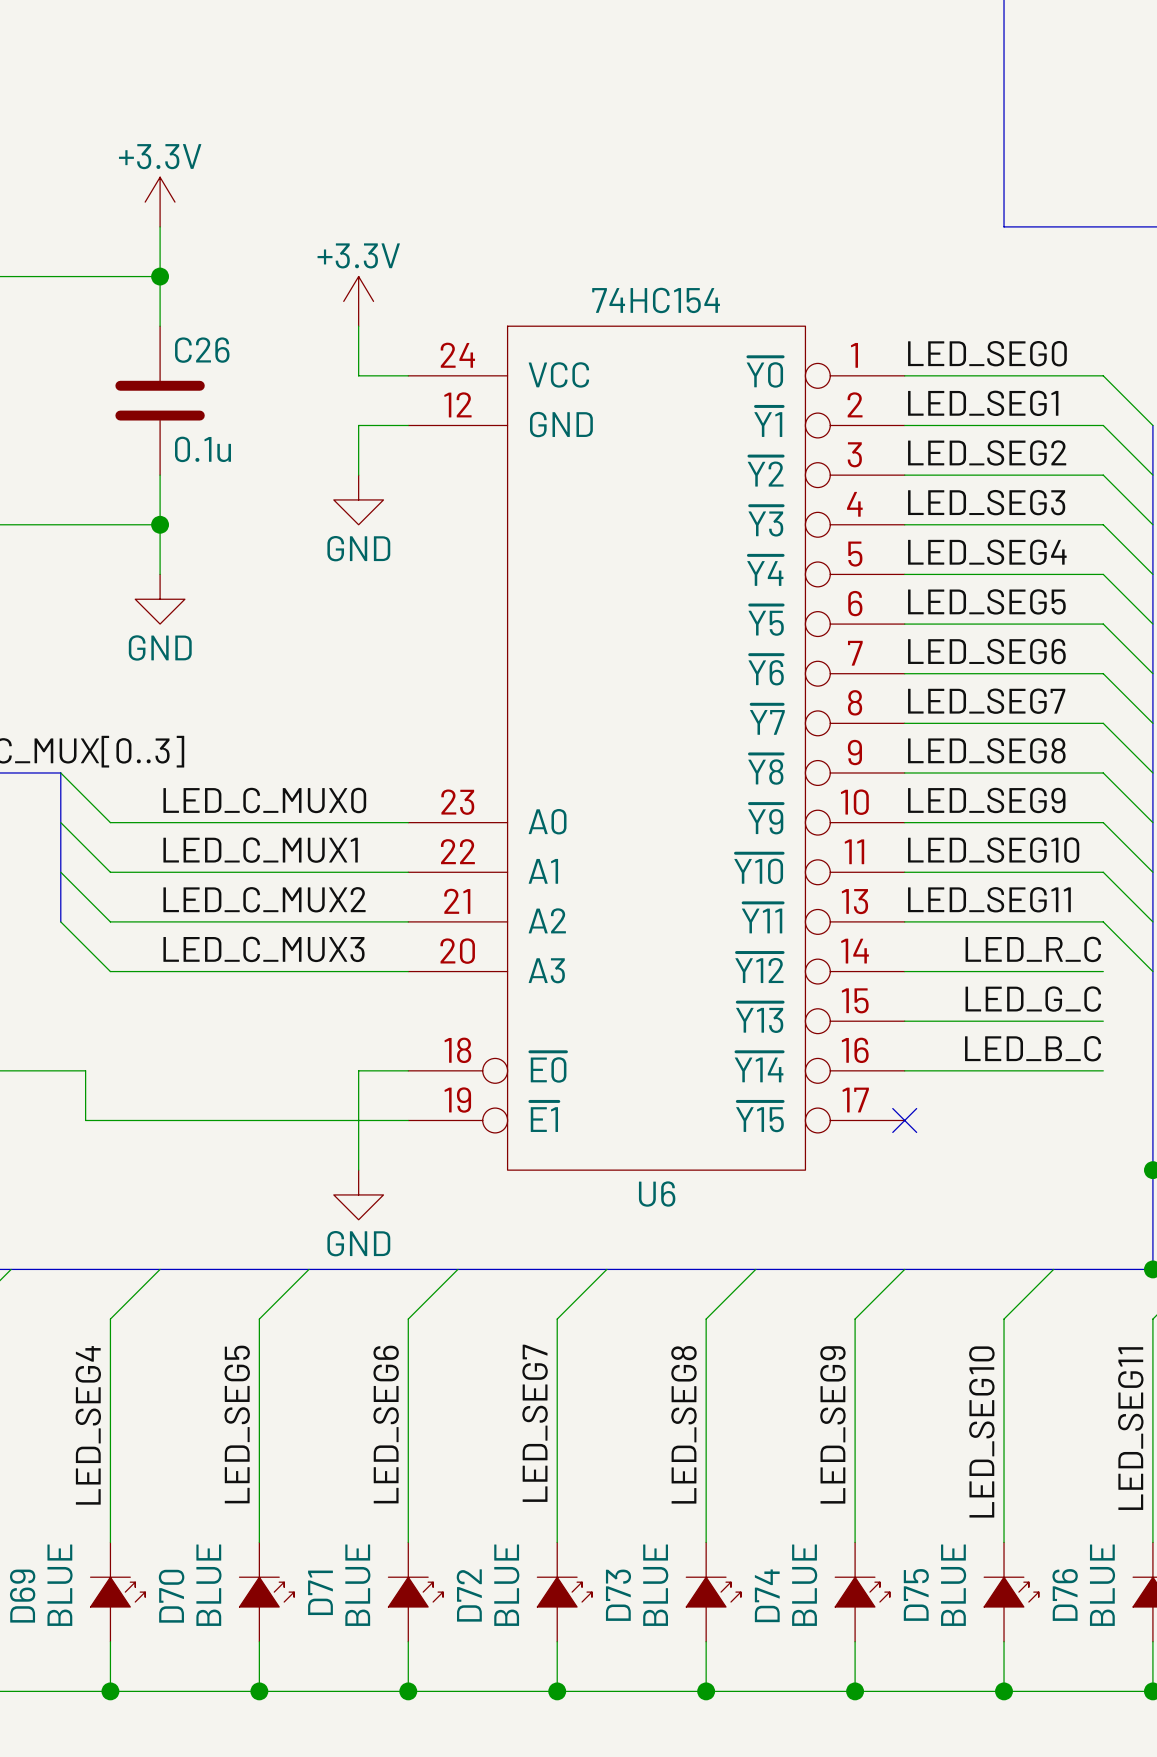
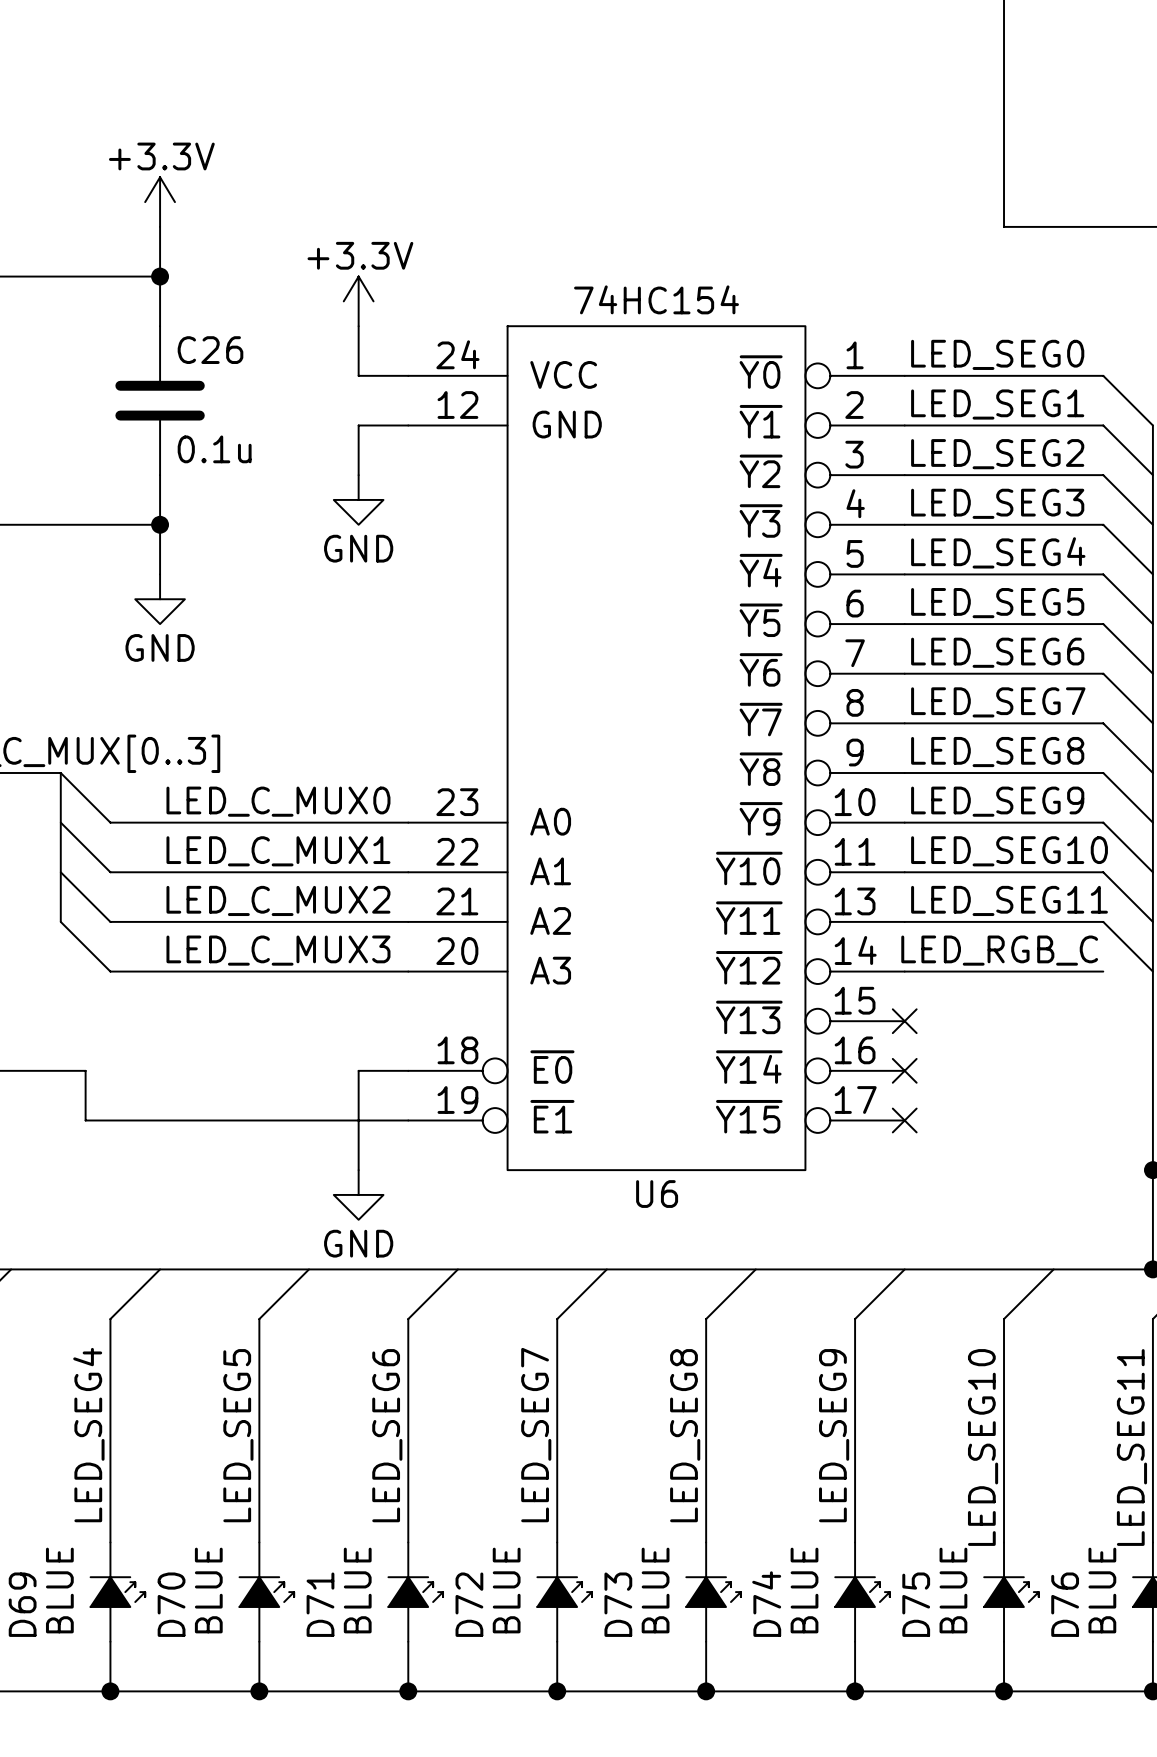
label: LED_R_C (1033, 949) -> LED_RGB_C (999, 950)
label: LED_G_C (1033, 999) -> none
wire: (904, 1021) (1103, 1021) -> none
no-connect mark: none -> (904, 1021)
label: LED_B_C (1033, 1048) -> none
wire: (904, 1070) (1103, 1070) -> none
no-connect mark: none -> (904, 1070)

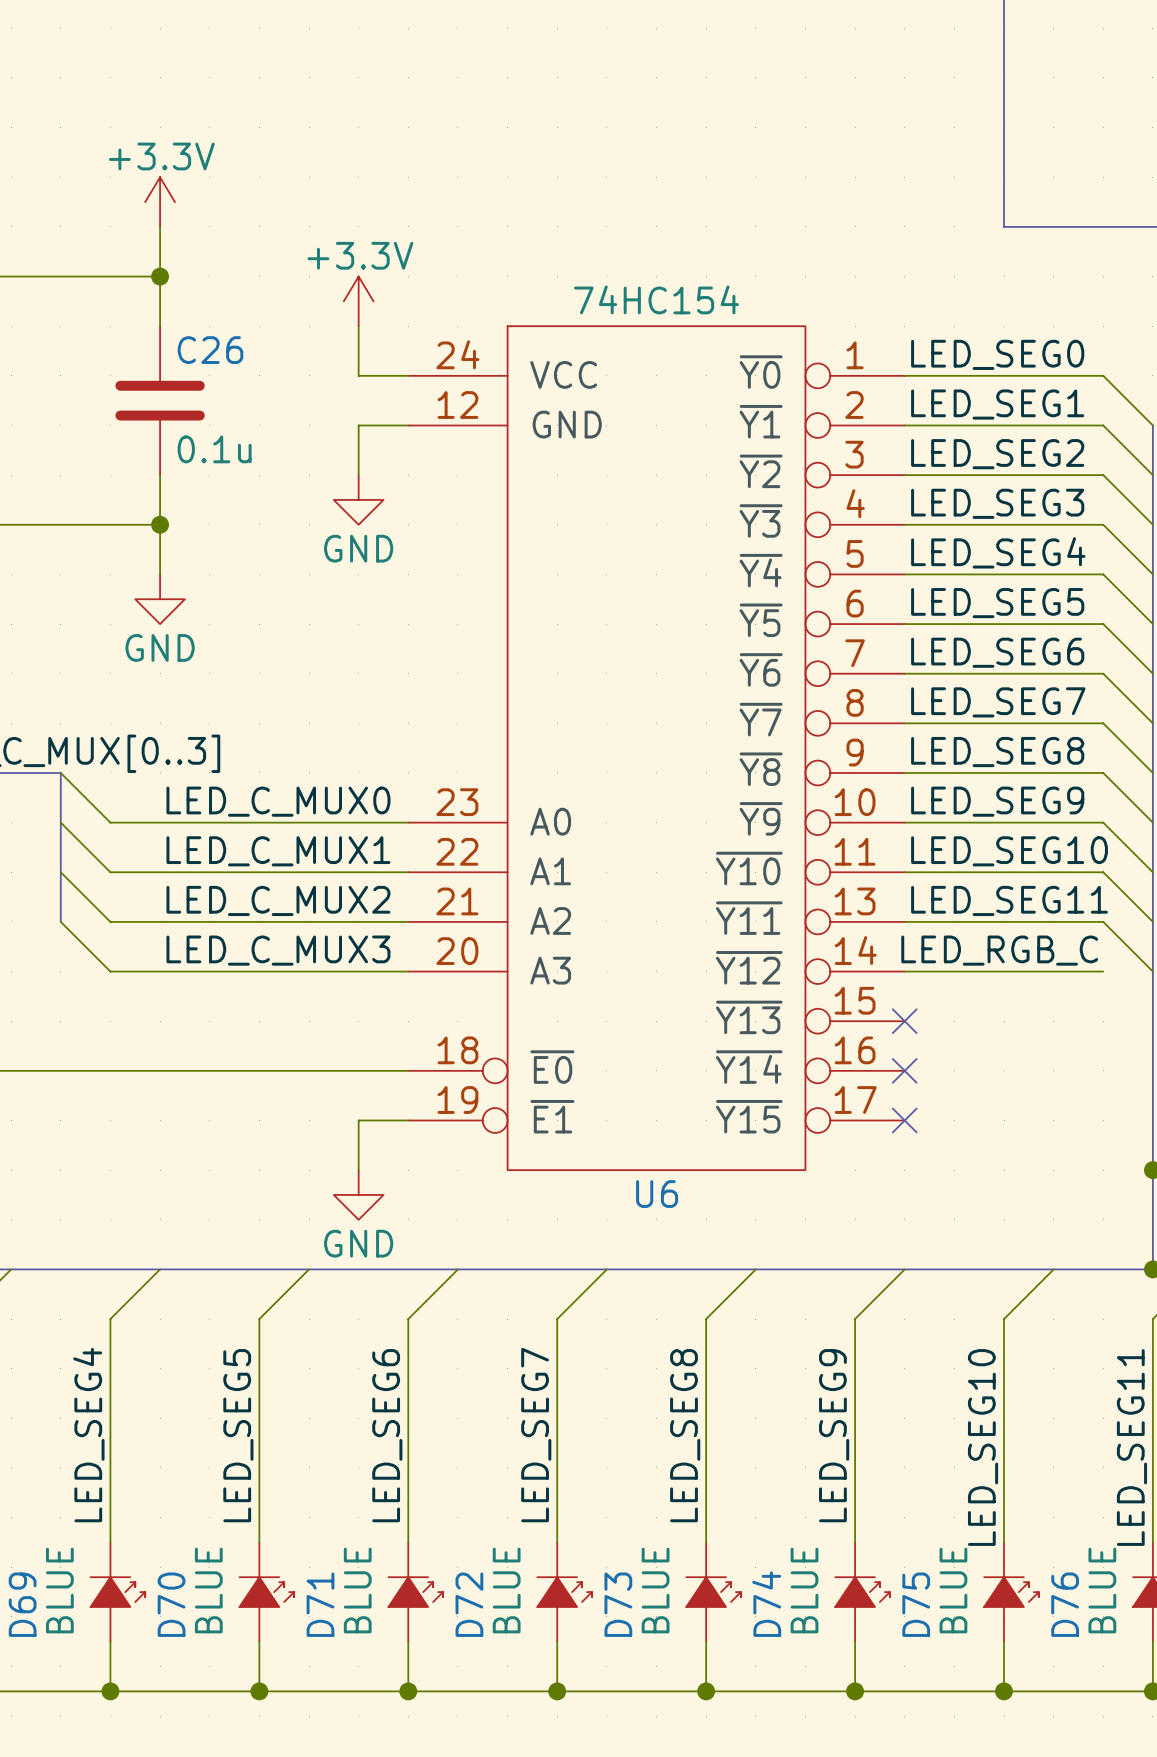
wire: (85, 1070) (85, 1120) (358, 1120) (358, 1070) -> (85, 1070) (358, 1070)

